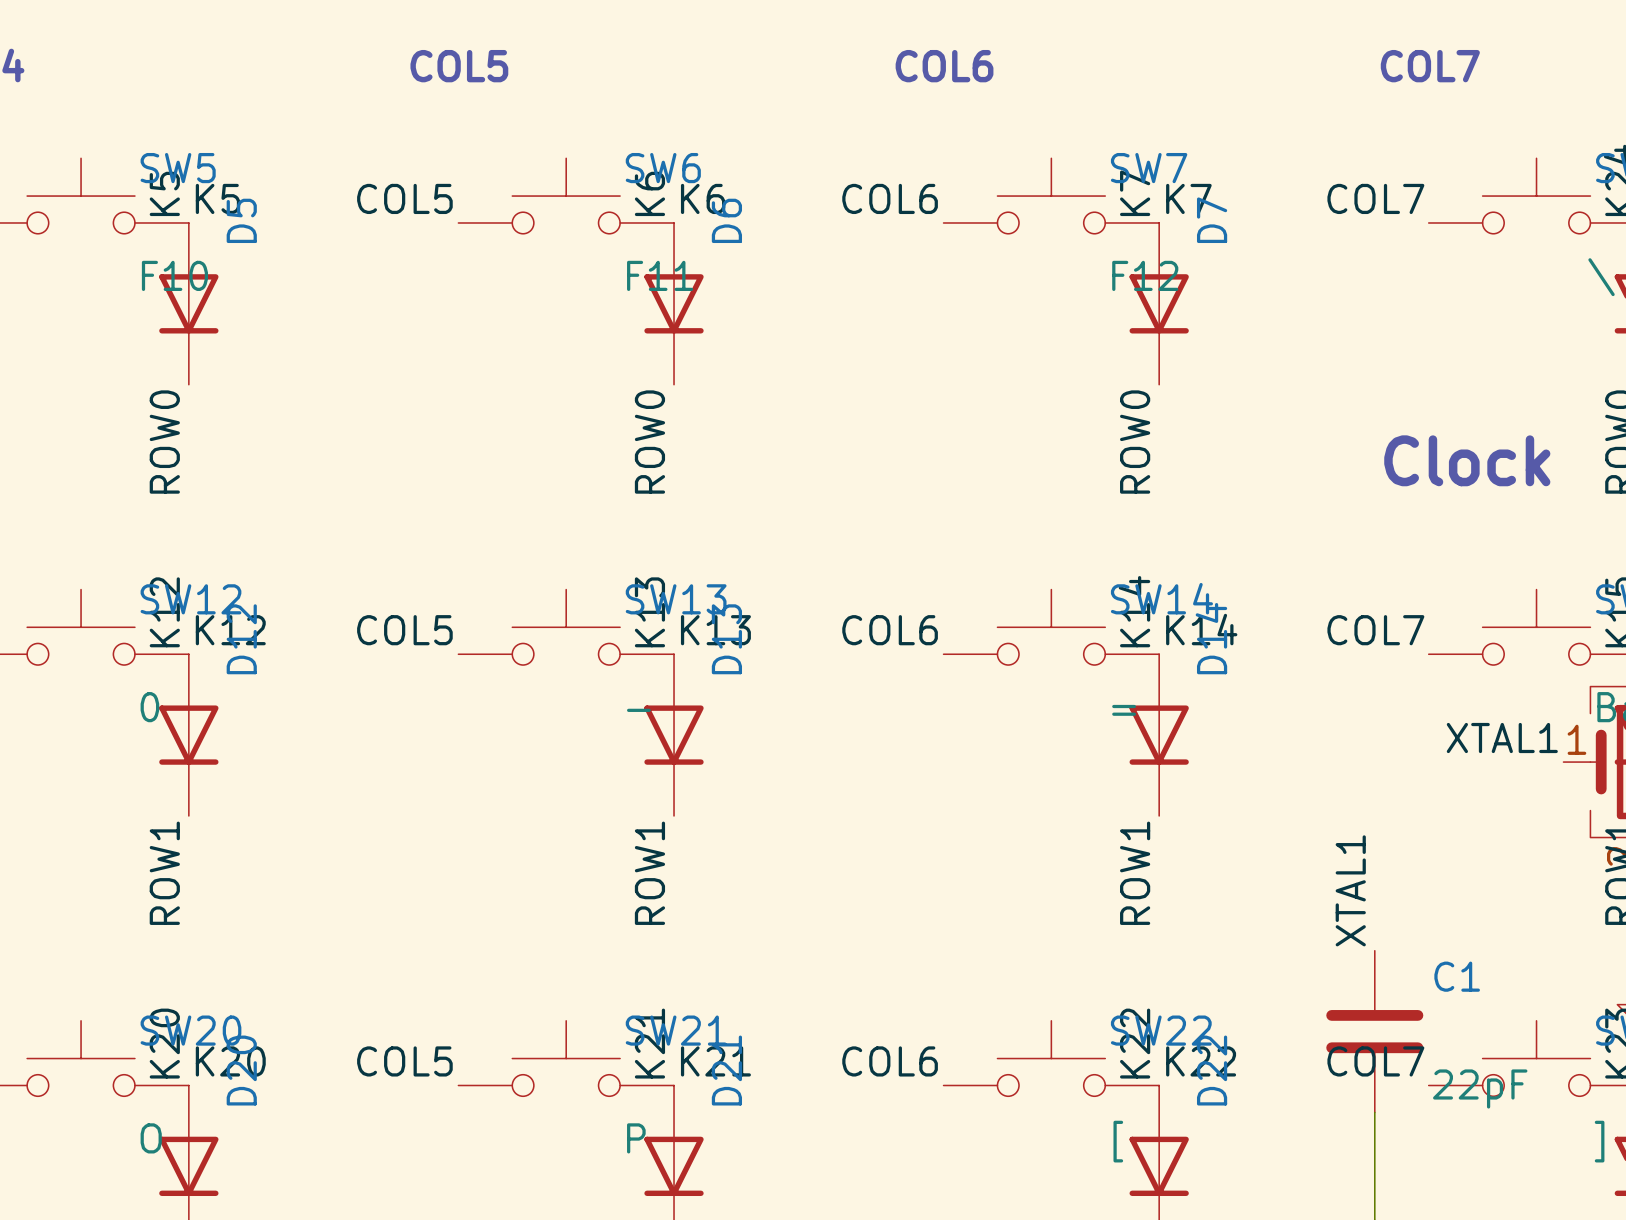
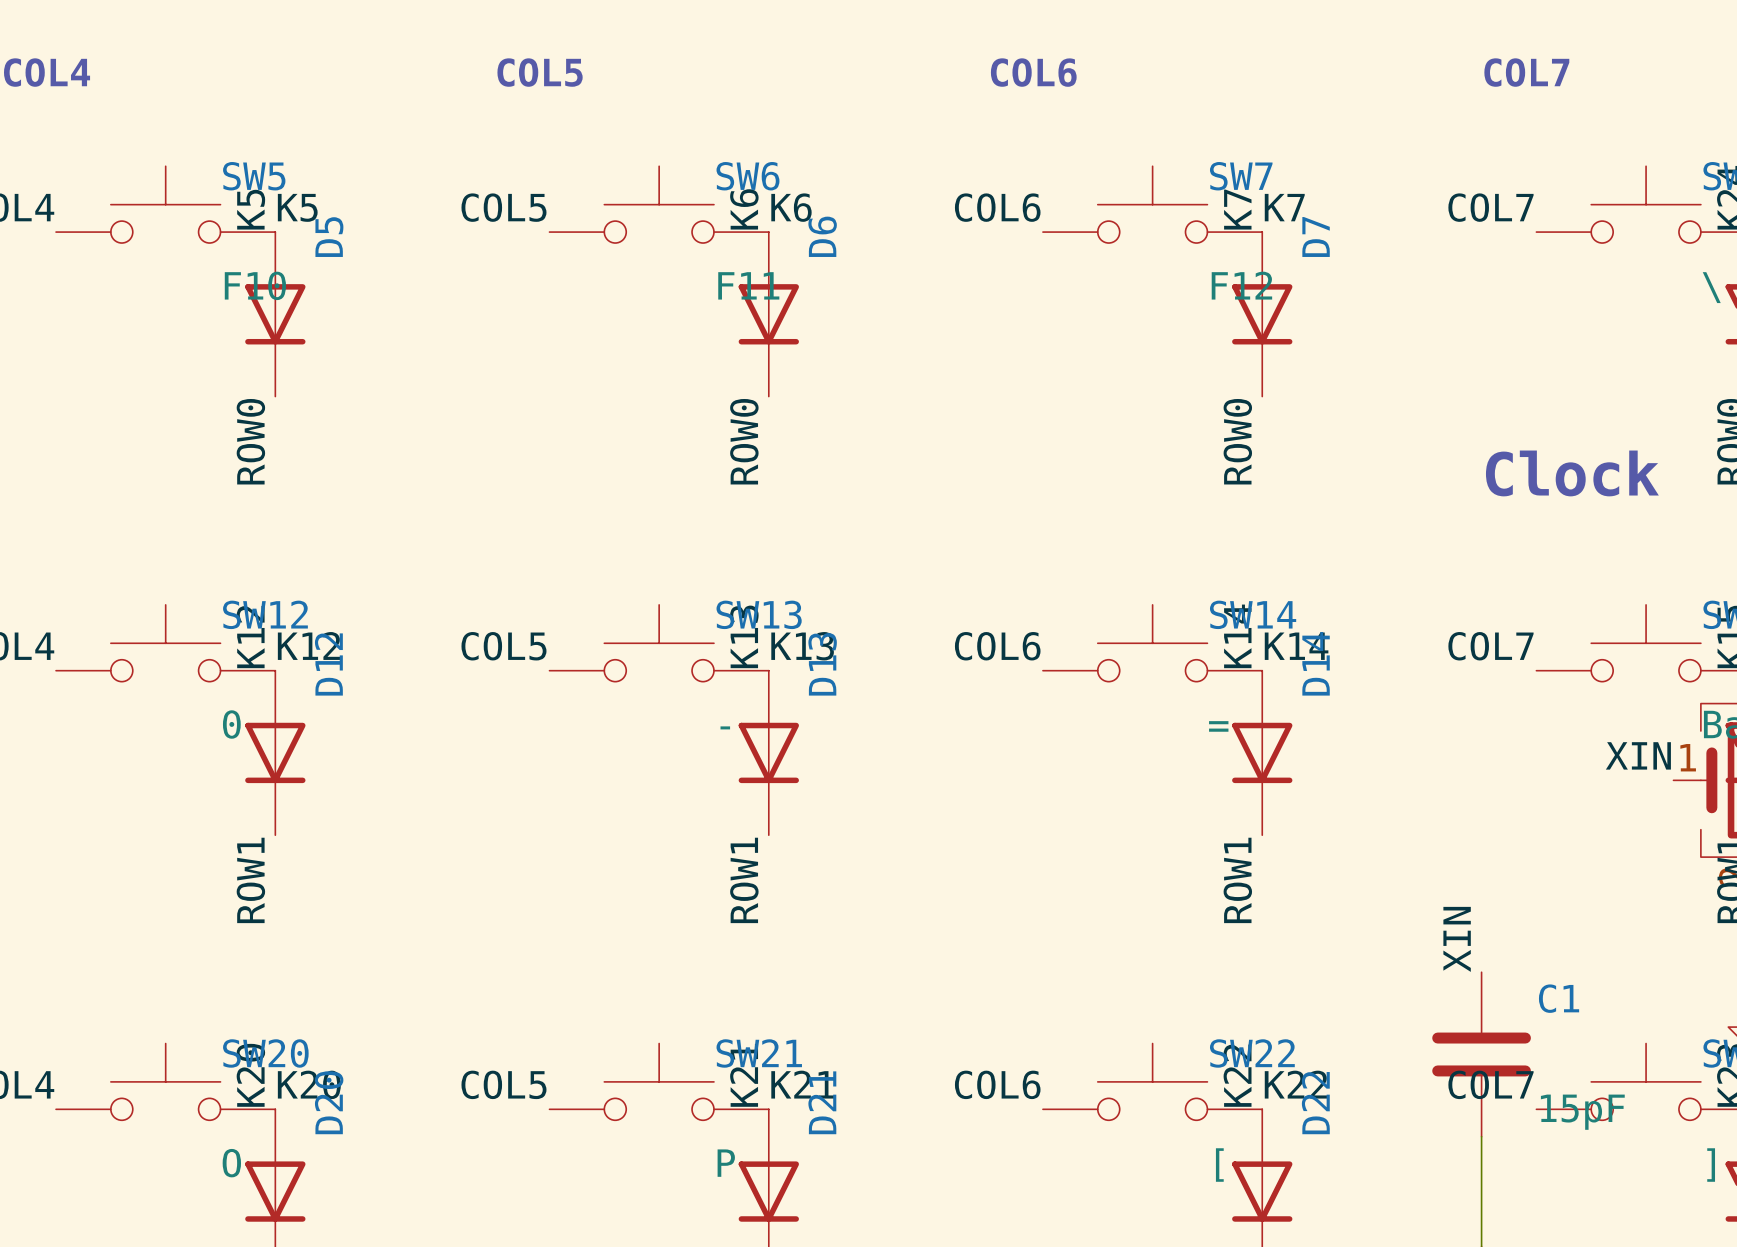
label: XTAL1 (1502, 738) -> XIN (1638, 755)
label: XTAL1 (1350, 890) -> XIN (1457, 939)
C1 value: 22pF (1480, 1088) -> 15pF (1582, 1112)

